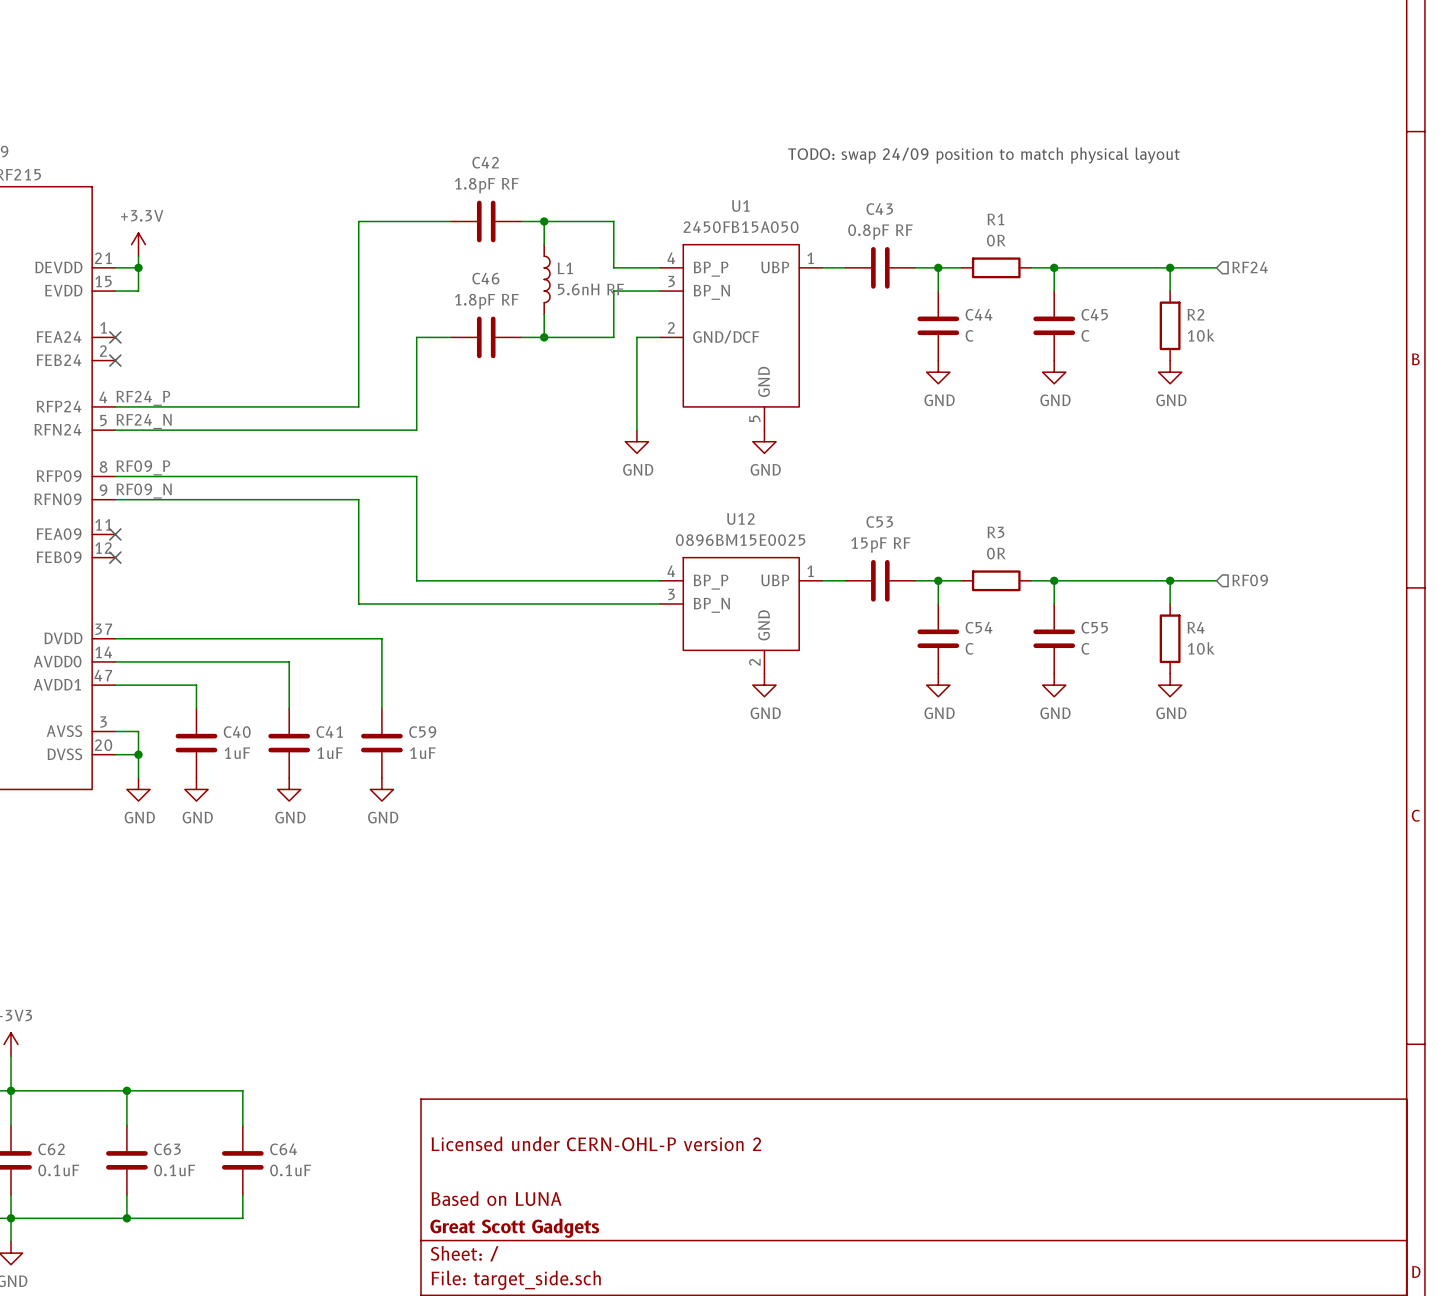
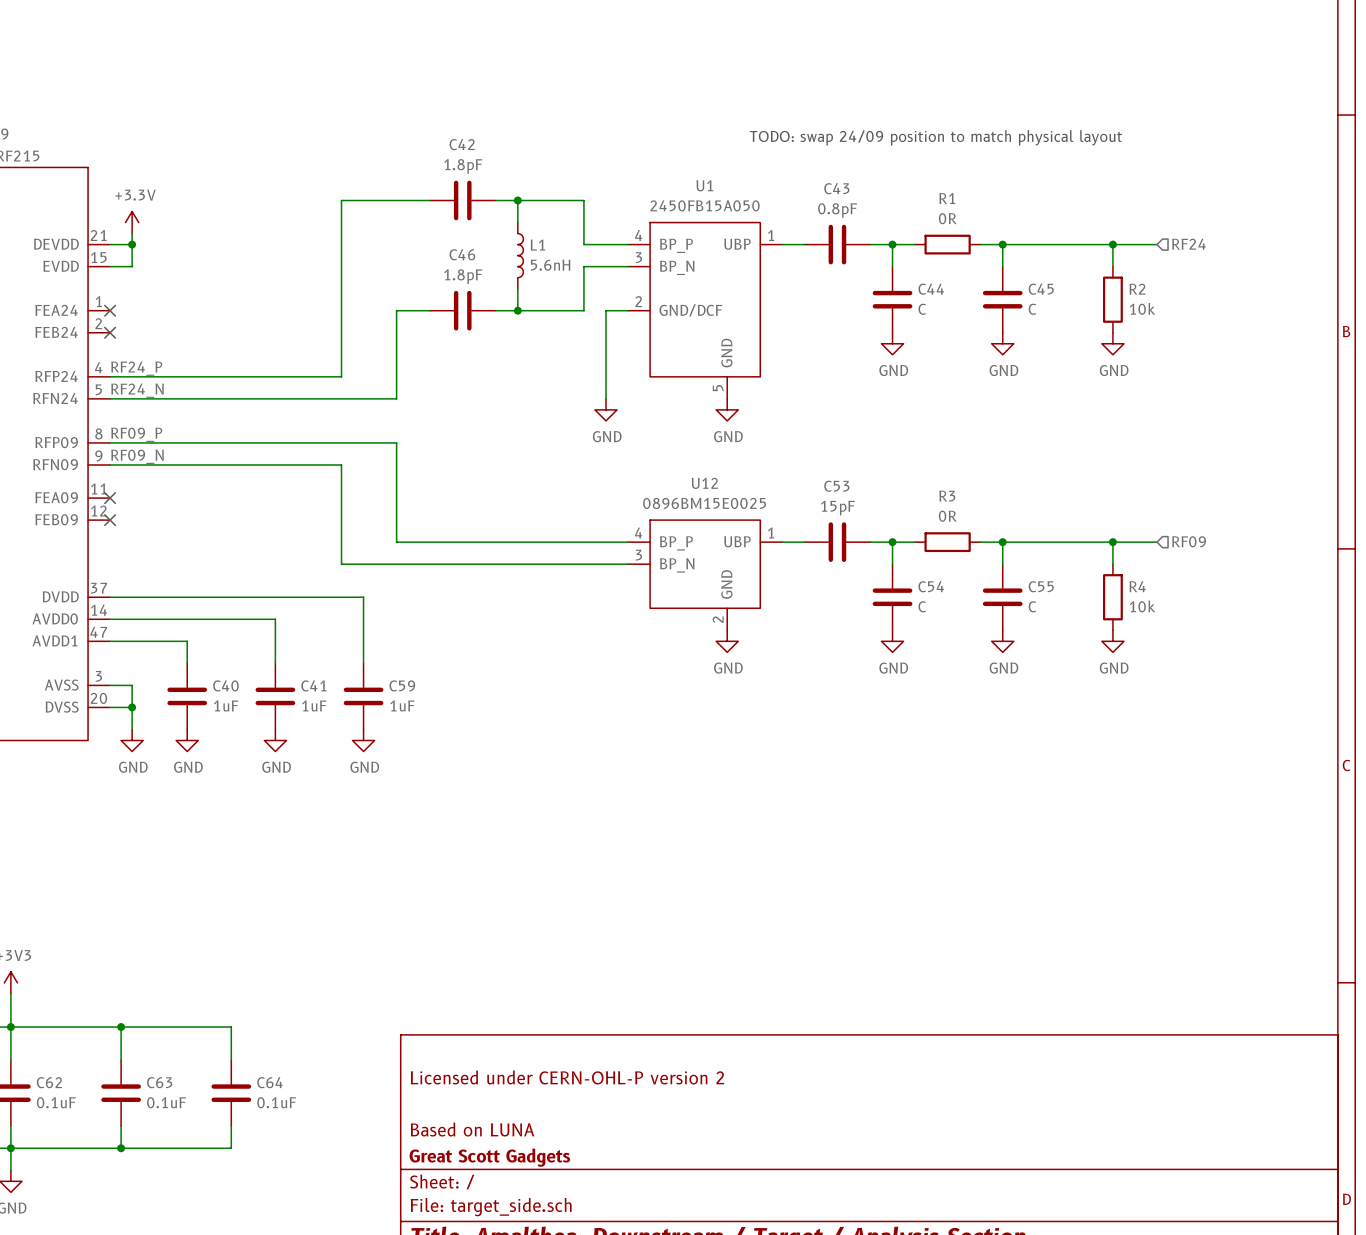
C42 value: 1.8pF RF (486, 185) -> 1.8pF (463, 166)
C43 value: 0.8pF RF (880, 232) -> 0.8pF (837, 210)
L1 value: 5.6nH RF (590, 289) -> 5.6nH (550, 265)
C46 value: 1.8pF RF (486, 301) -> 1.8pF (463, 276)
C53 value: 15pF RF (880, 544) -> 15pF (837, 508)

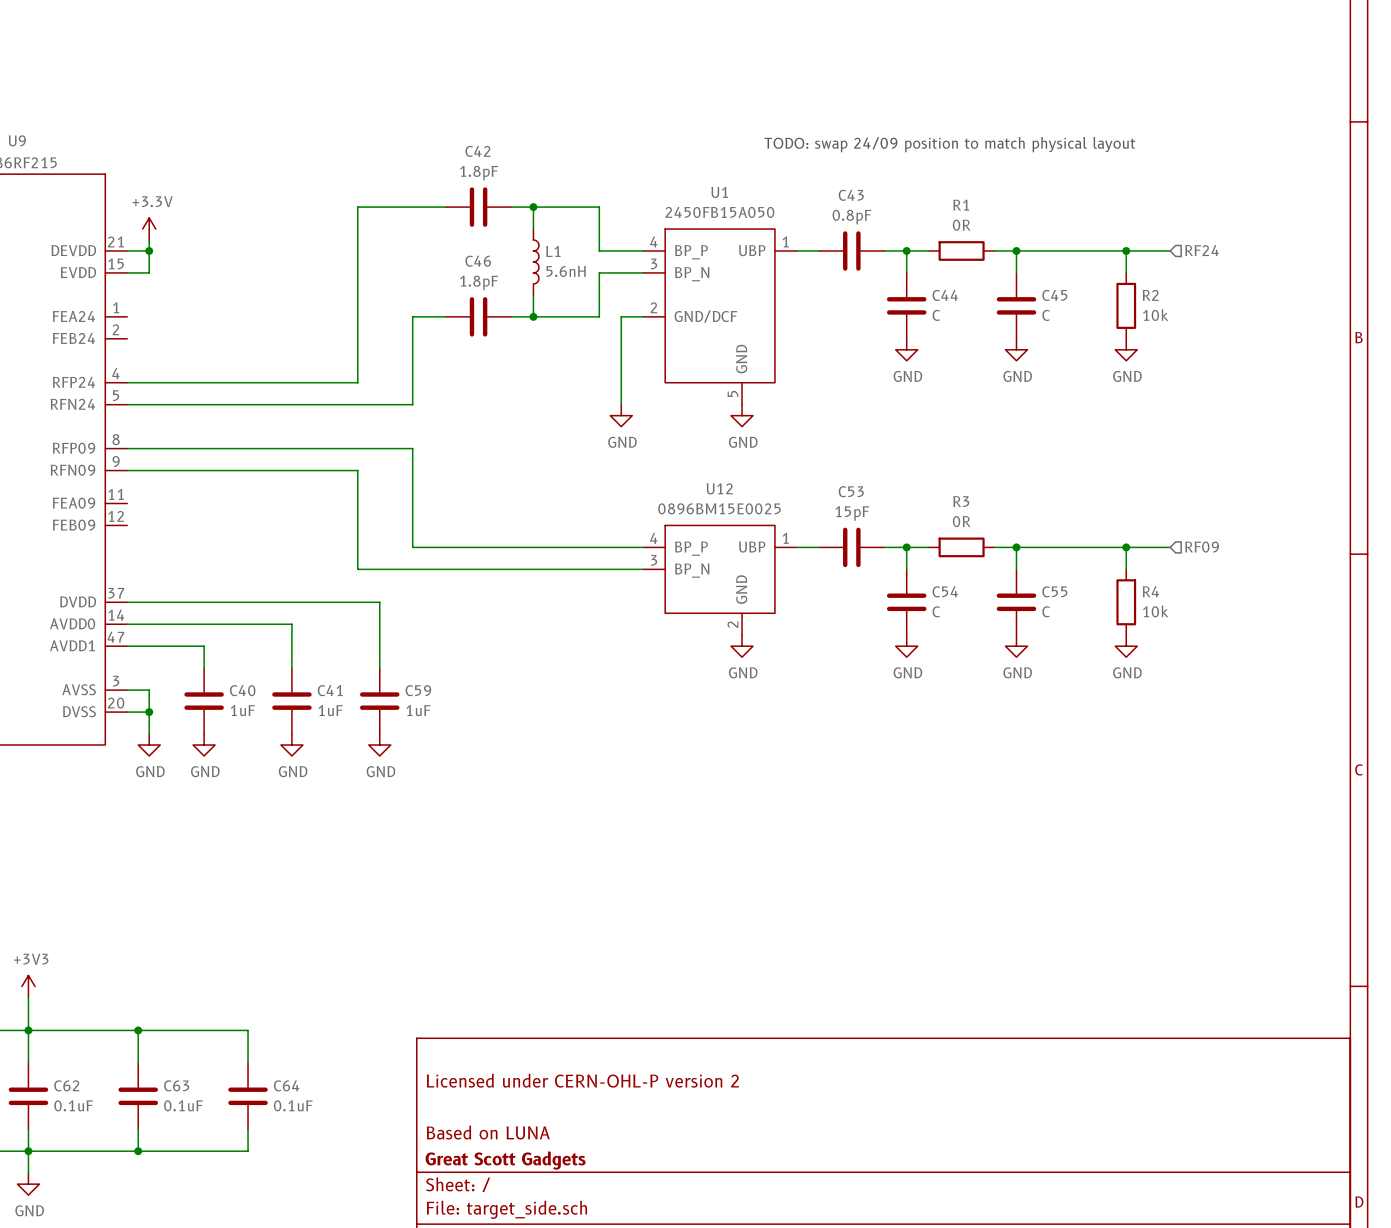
no-connect mark: (110, 310) -> none
no-connect mark: (110, 332) -> none
label: RF24_P (136, 368) -> none
label: RF24_N (137, 390) -> none
label: RF09_P (136, 434) -> none
label: RF09_N (137, 456) -> none
no-connect mark: (110, 498) -> none
no-connect mark: (110, 520) -> none

